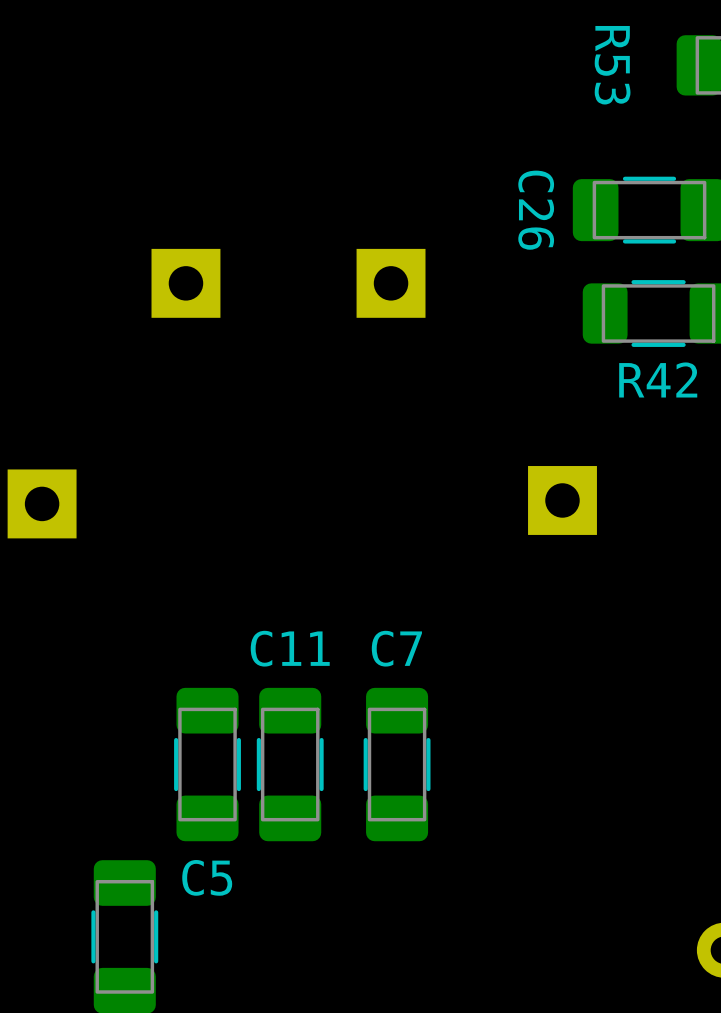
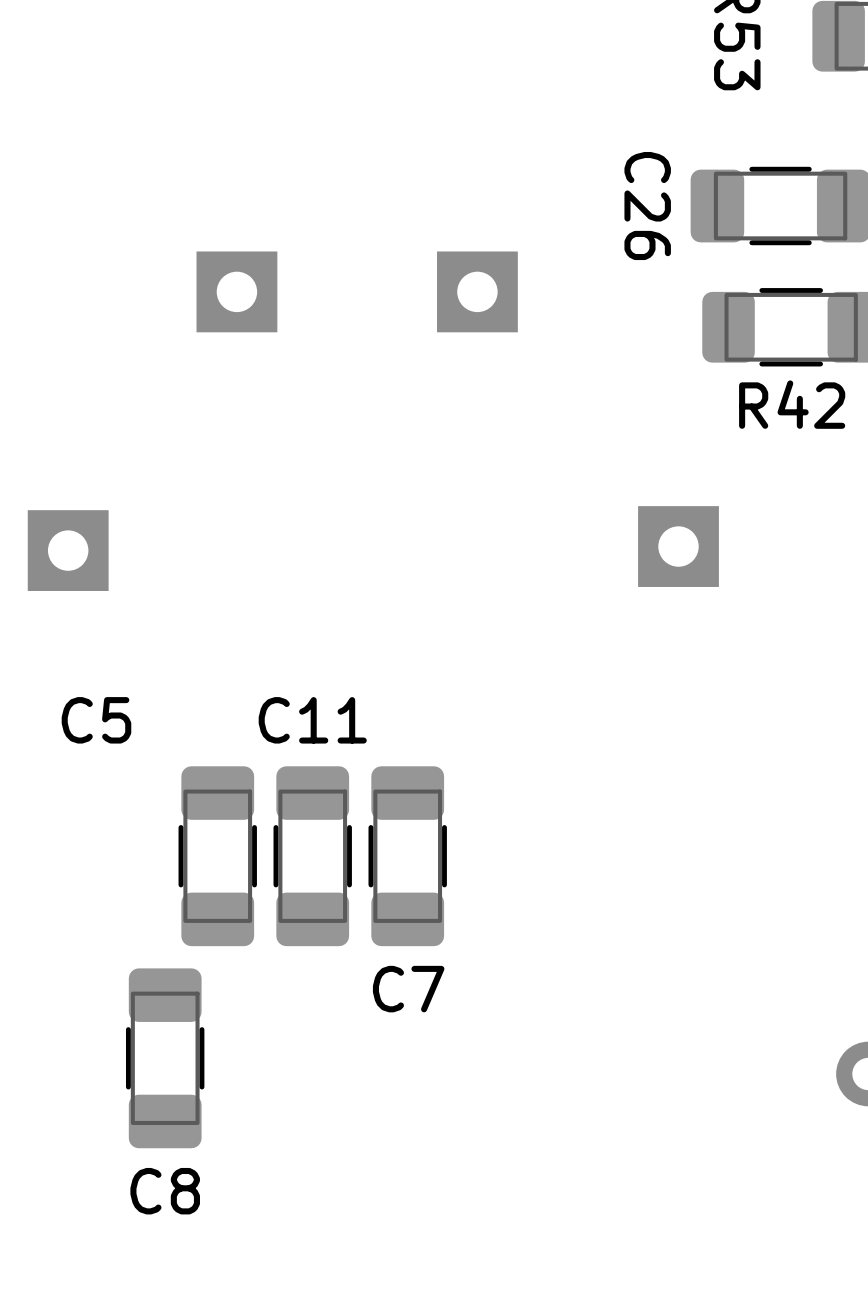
C7 name position: C7 (396, 648) -> C7 (408, 989)
C5 position: (207, 764) -> (217, 856)
C11 position: (290, 764) -> (312, 856)
C7 position: (397, 764) -> (407, 856)
C5 name position: C5 (207, 877) -> C5 (96, 720)

